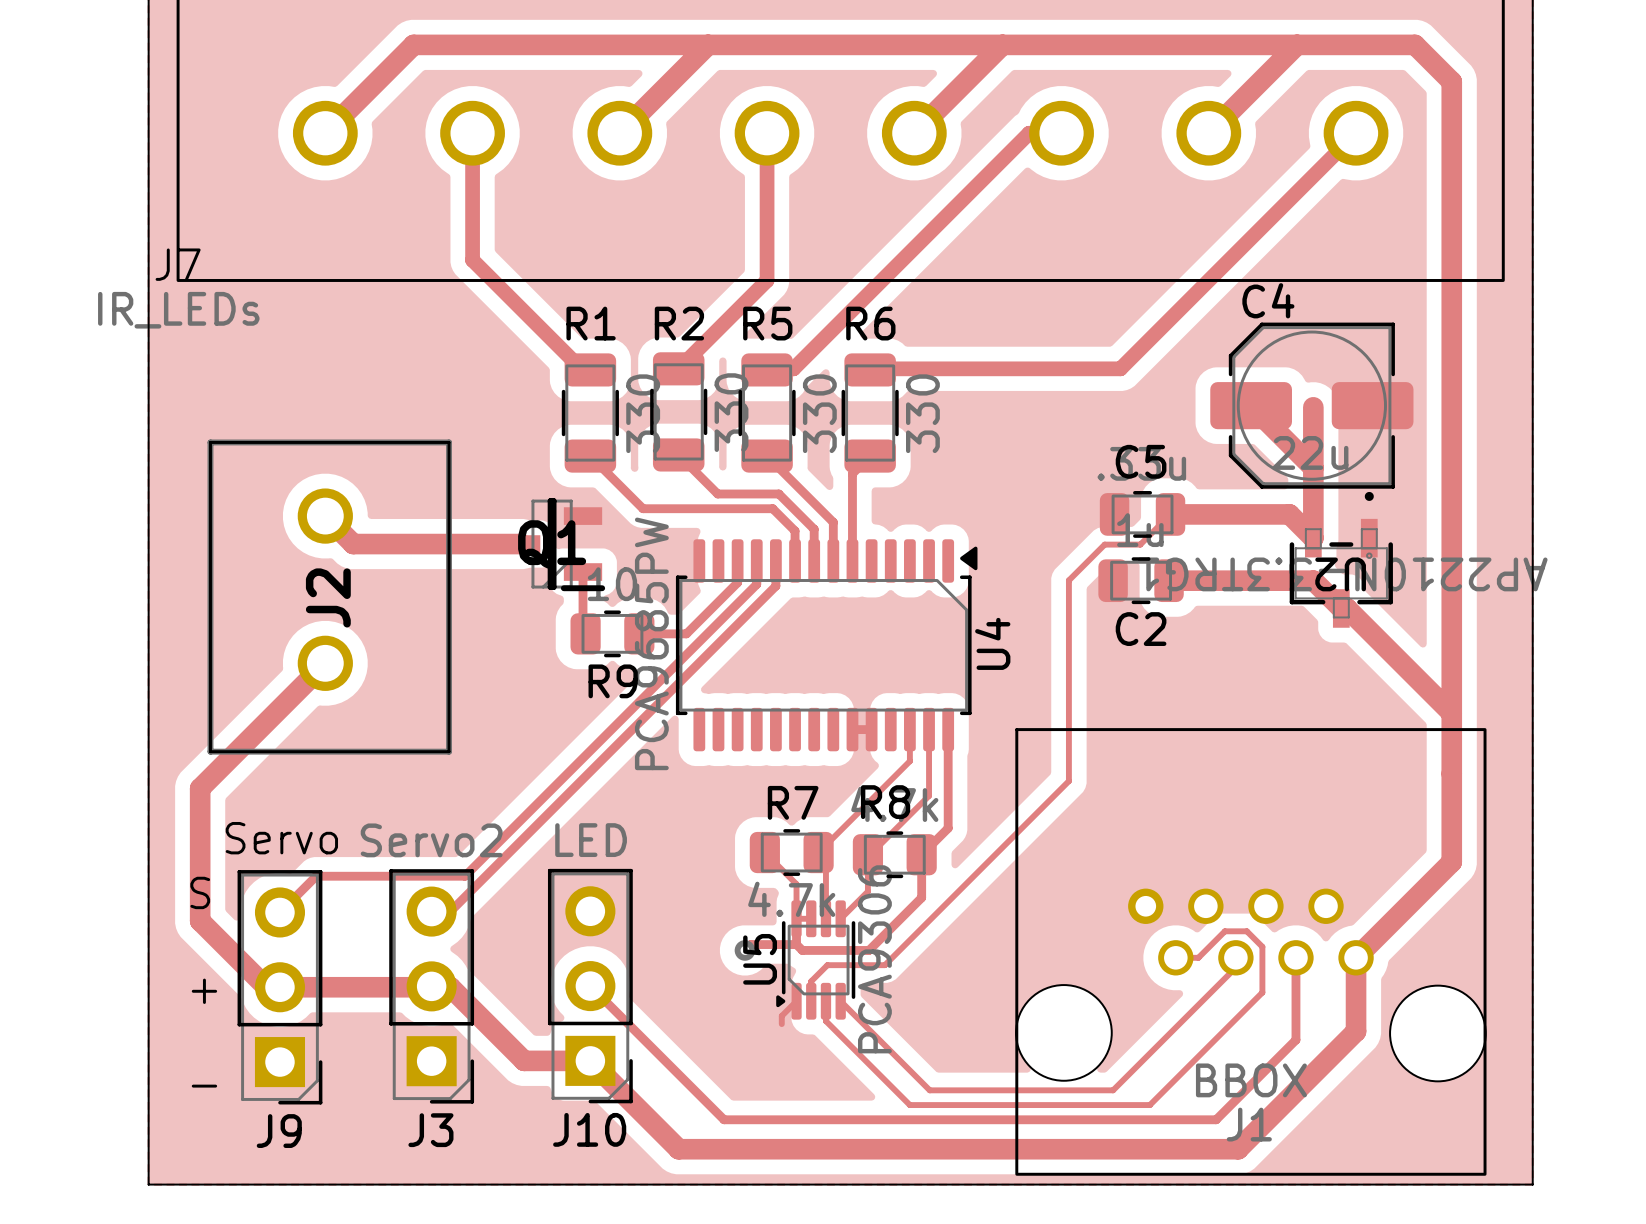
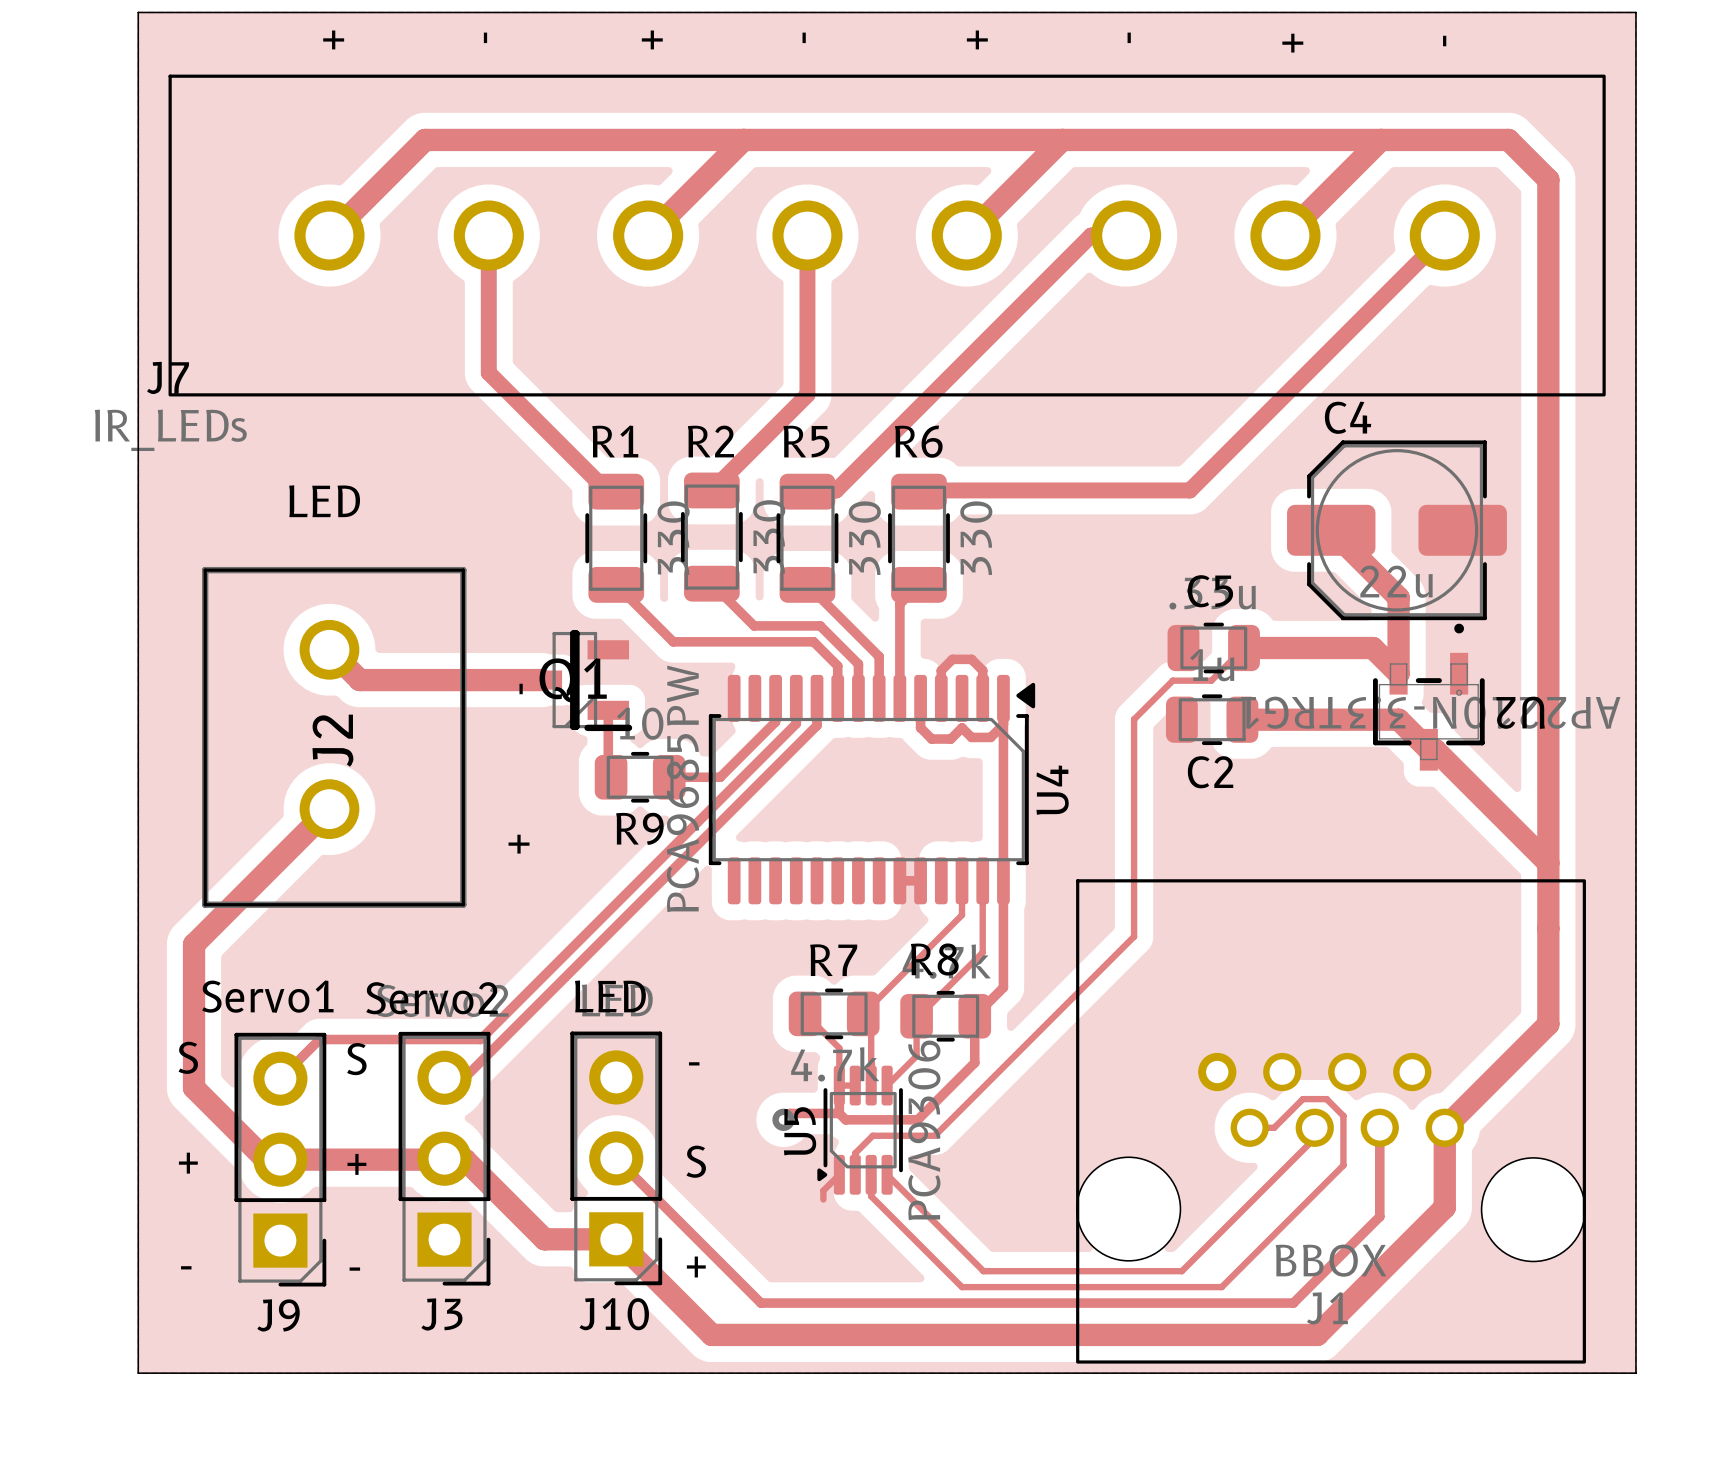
text: none -> LED (324, 501)
track: (1313, 407) (1313, 467) -> none
track: none -> (920, 698) (920, 727) (931, 739) (950, 739) (962, 727) (971, 737) (990, 737) (1003, 724)
track: none -> (941, 698) (941, 670) (952, 659) (971, 659) (982, 670) (982, 698)
track: none -> (1003, 698) (1003, 880)
text: none -> + - (519, 768)
U2 name position: U2 (1340, 574) -> U2 (1520, 712)
text: none -> LED (610, 996)
text: none -> Servo2 (432, 998)
text: Servo (281, 838) -> Servo1 (267, 996)
text: none -> S (356, 1059)
text: none -> - (694, 1063)
text: none -> S (696, 1161)
text: none -> + (356, 1164)
text: none -> - (354, 1269)
text: none -> + (696, 1267)

